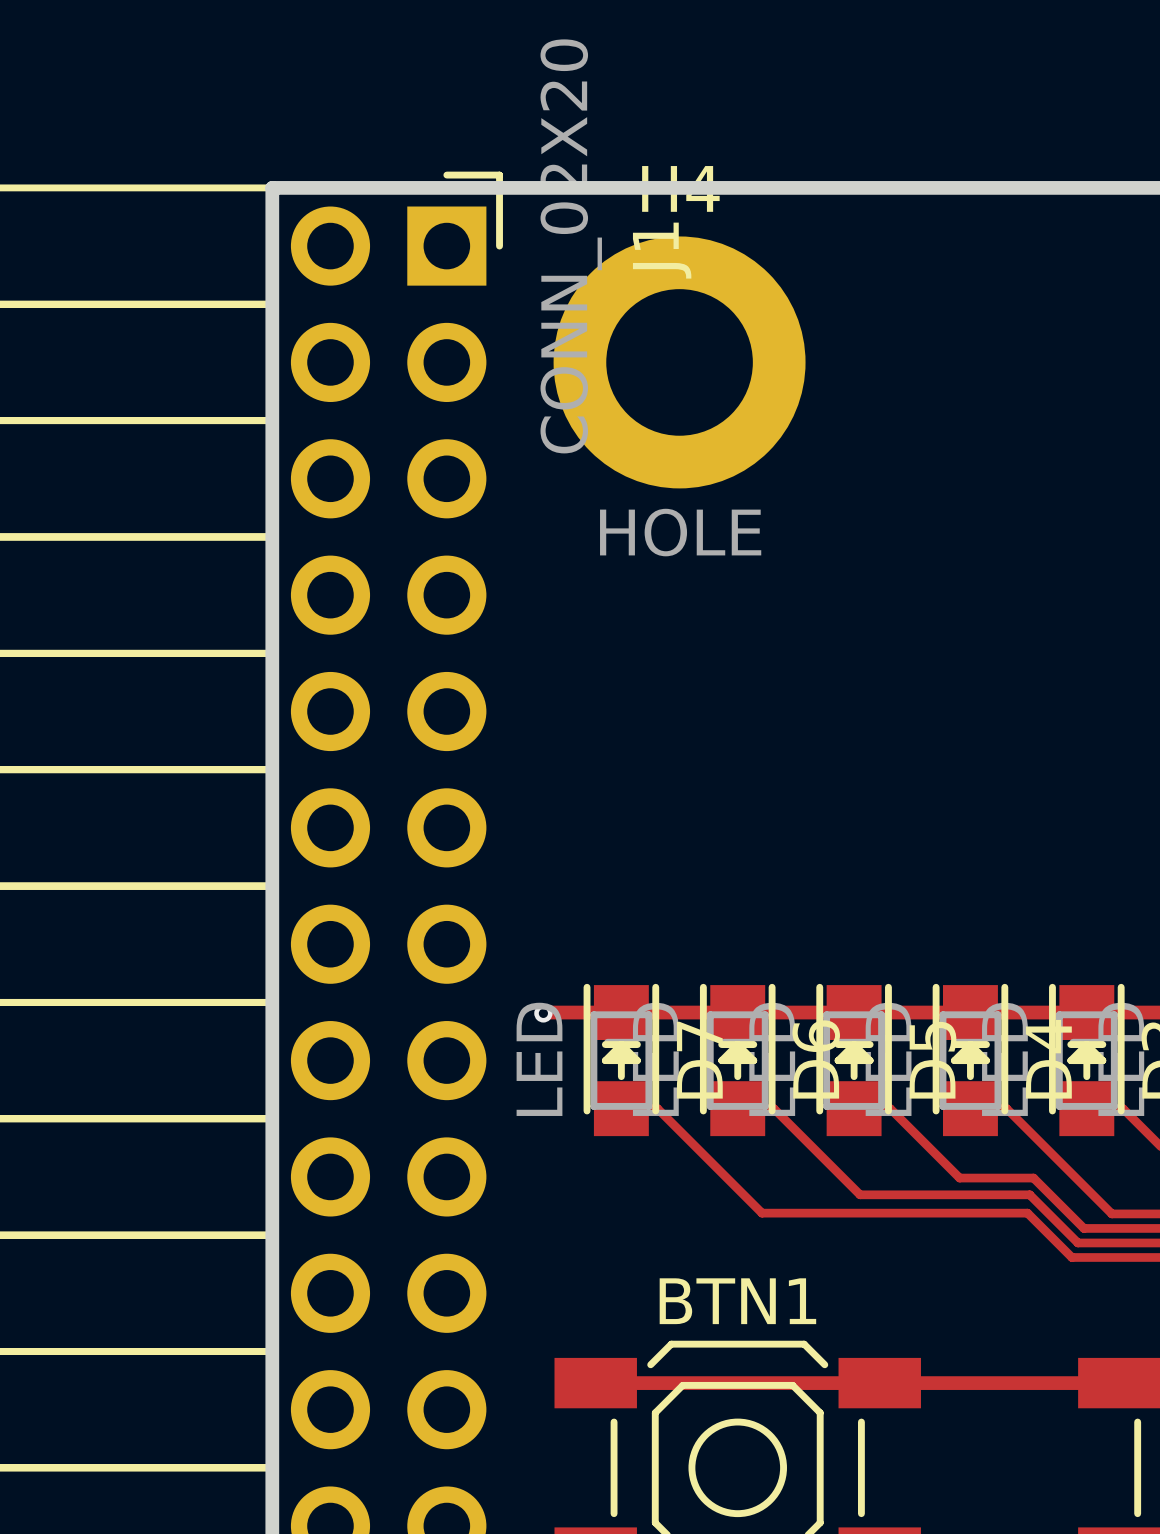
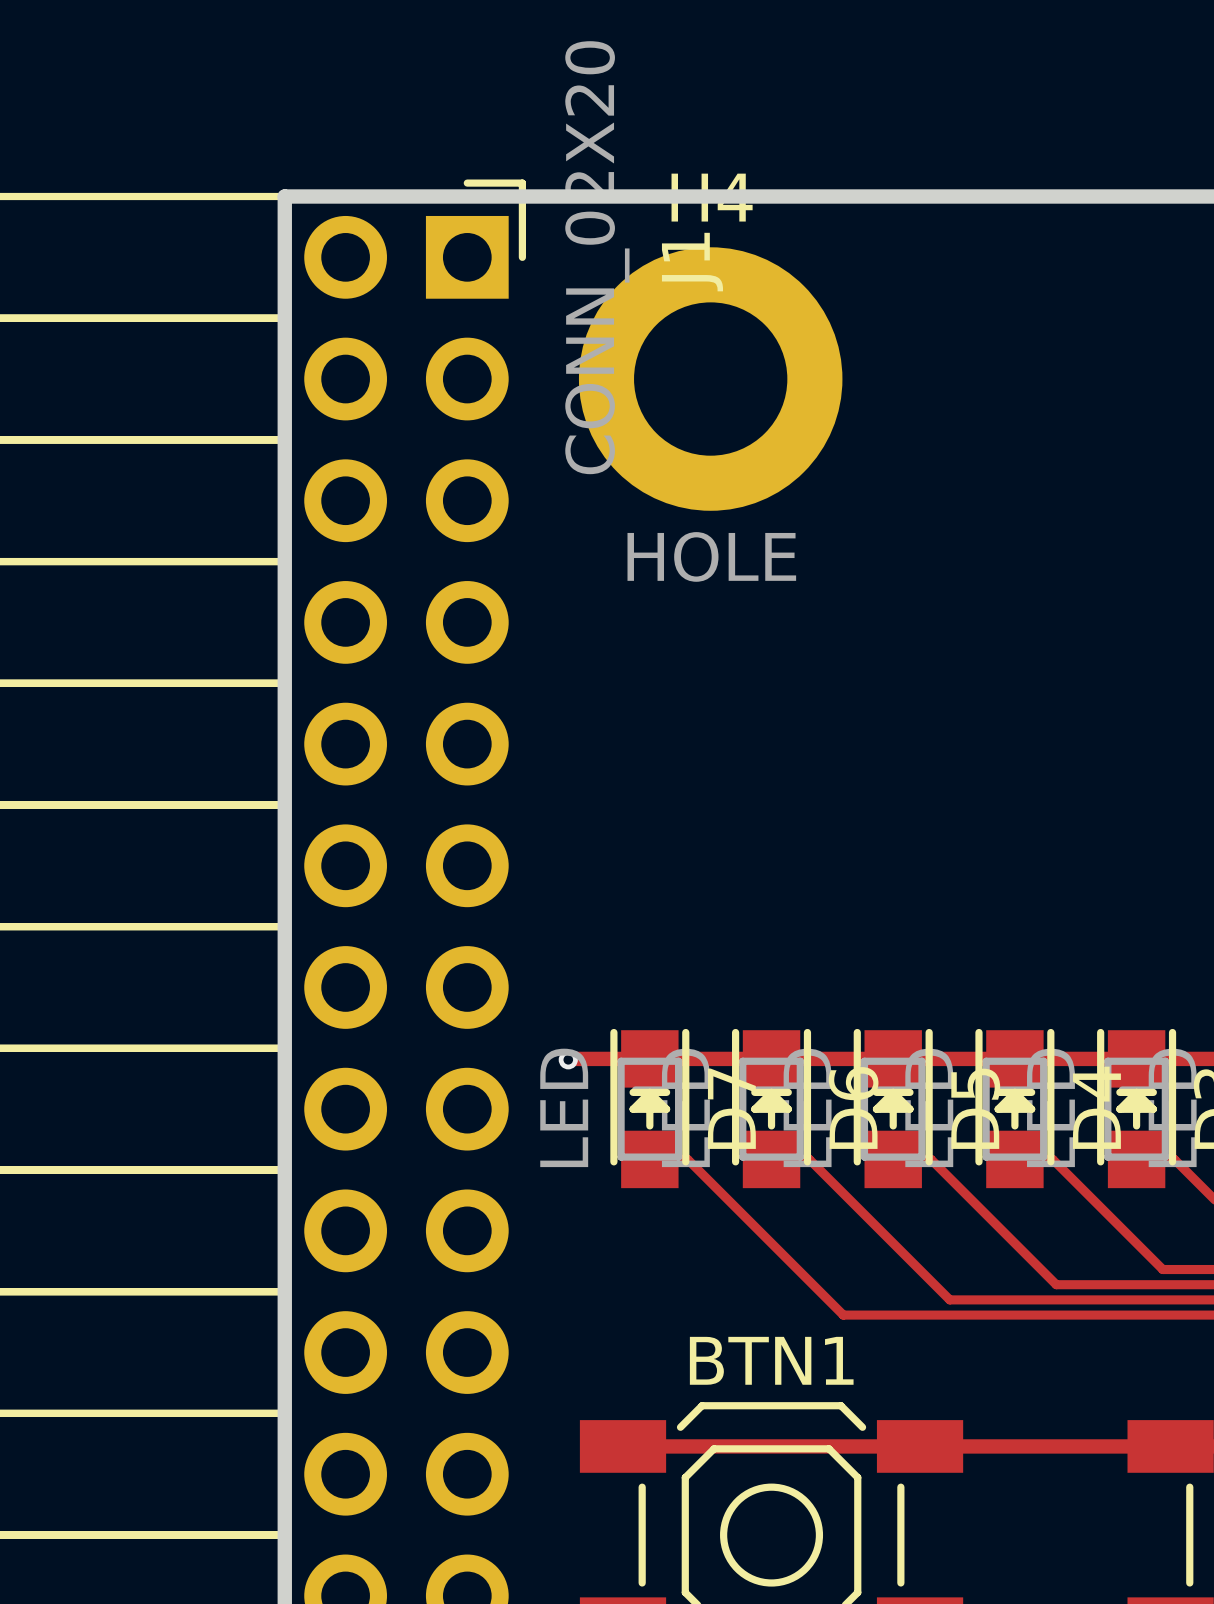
track: (959, 1178) (1033, 1178) (1083, 1228) -> (1003, 1232) (1056, 1284) (1133, 1284)
track: (860, 1194) (1029, 1194) (1077, 1242) -> (899, 1249) (949, 1299) (1127, 1299)
track: (762, 1213) (1027, 1213) (1071, 1257) -> (796, 1268) (843, 1315) (1121, 1315)

